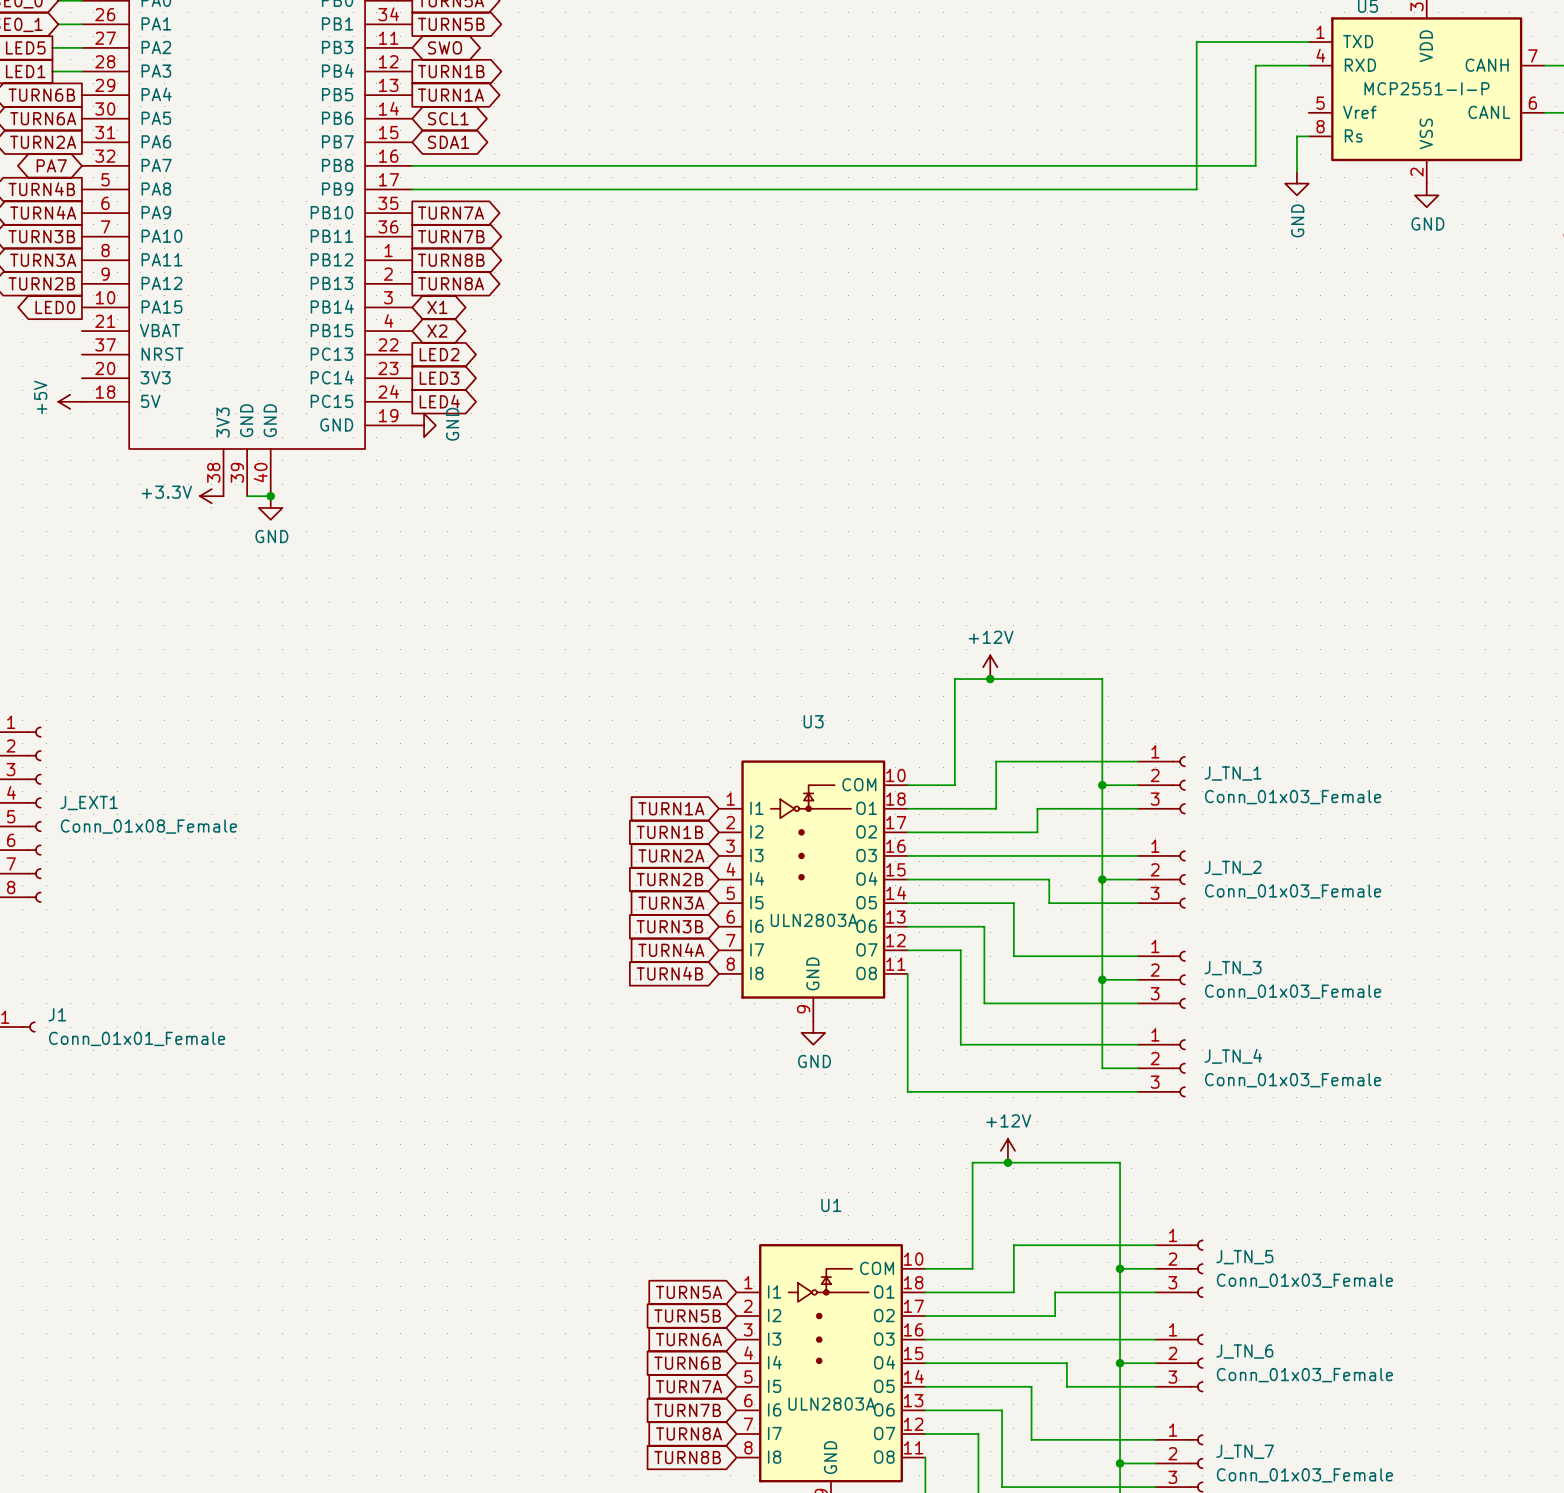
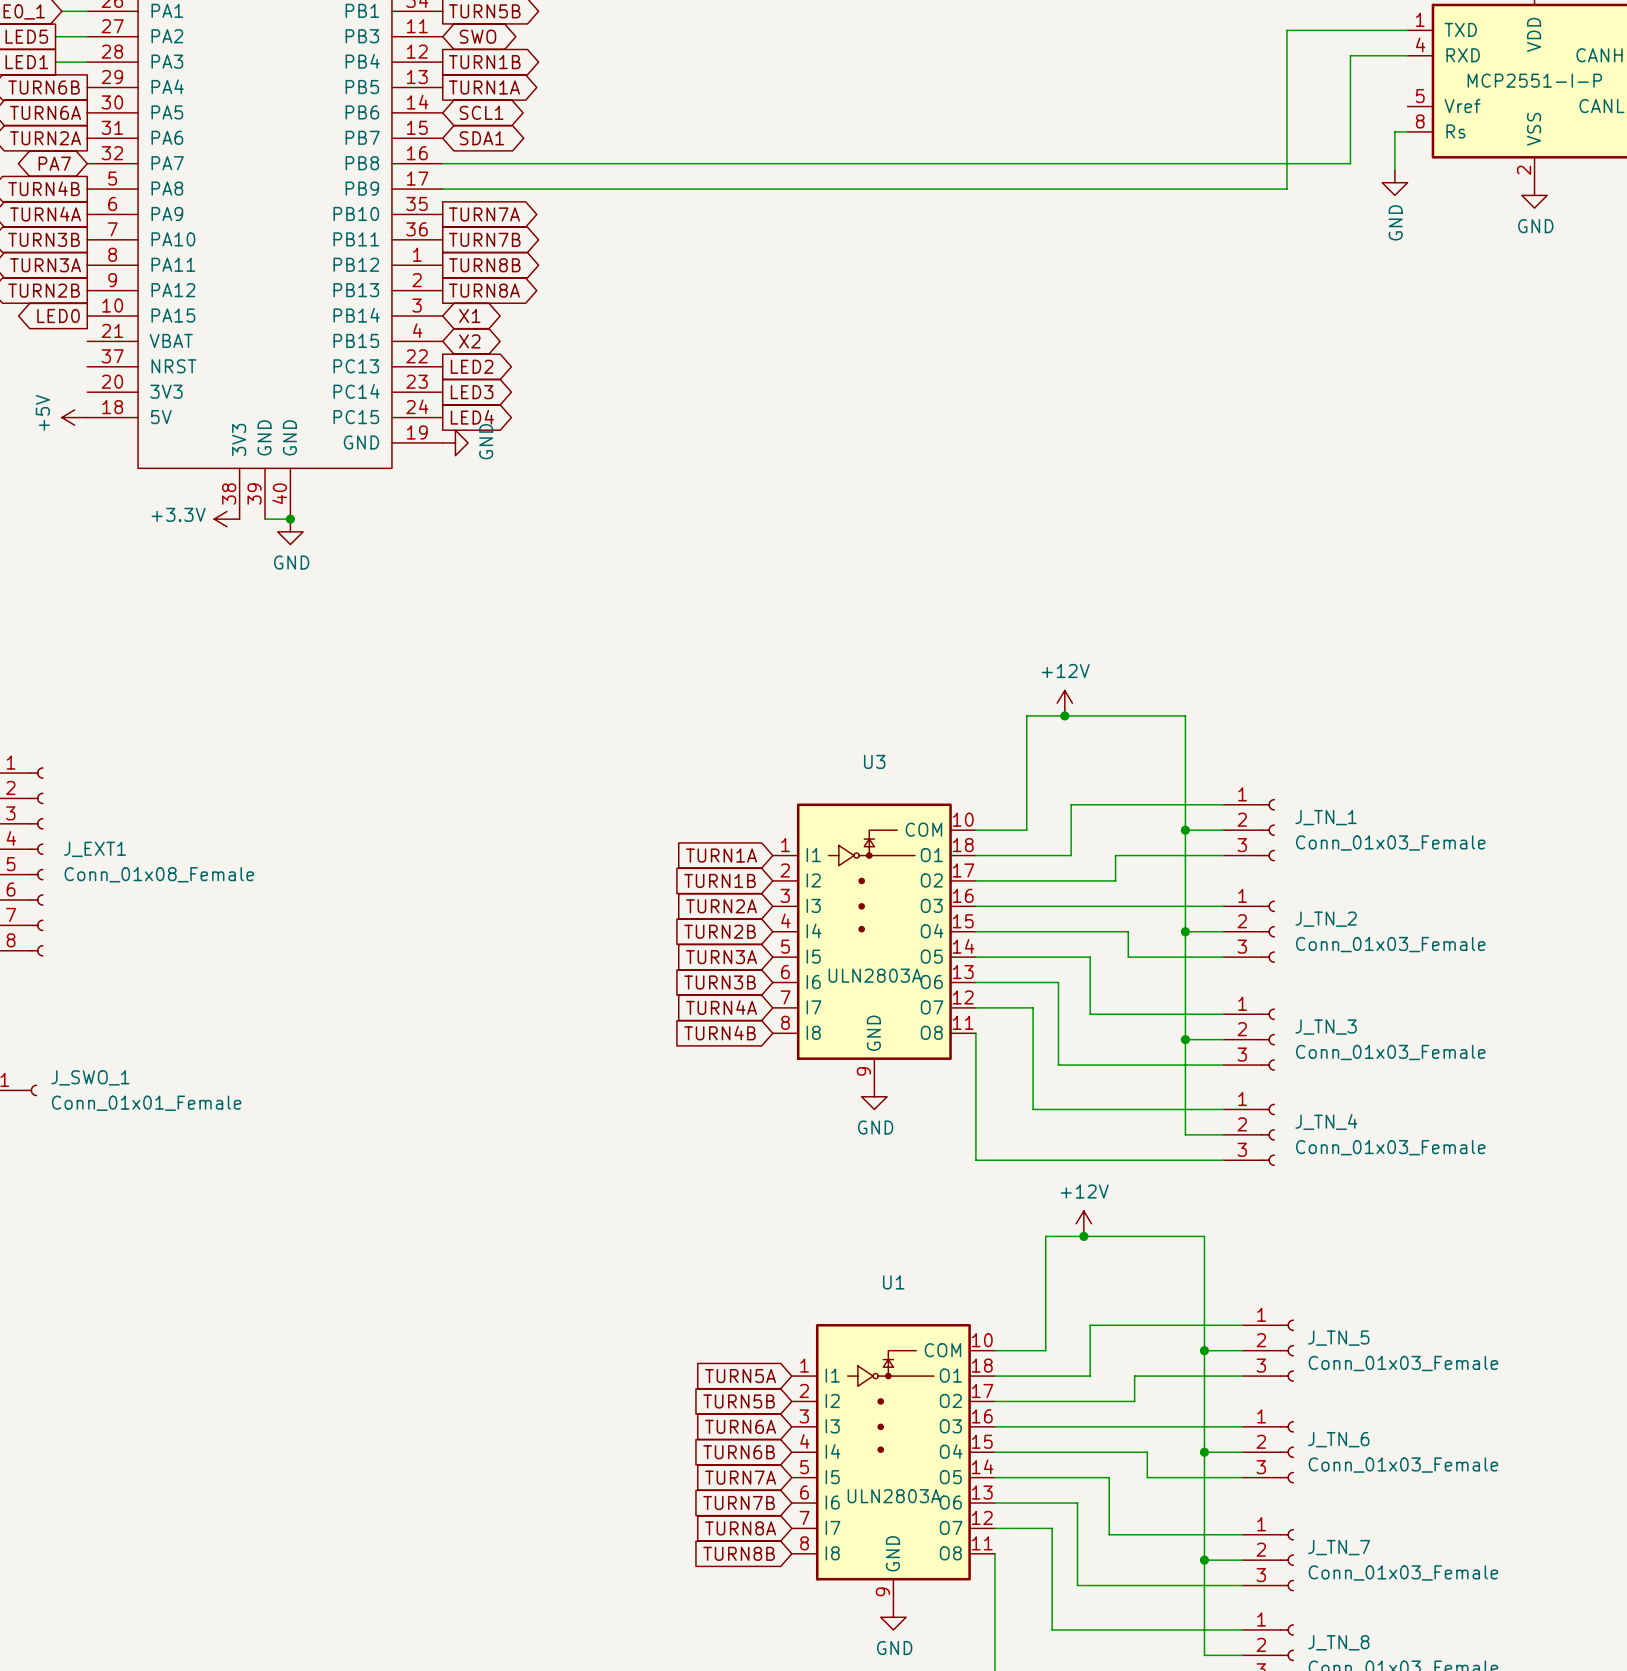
J1 name: J1 (57, 1014) -> J_SWO_1 (90, 1077)

